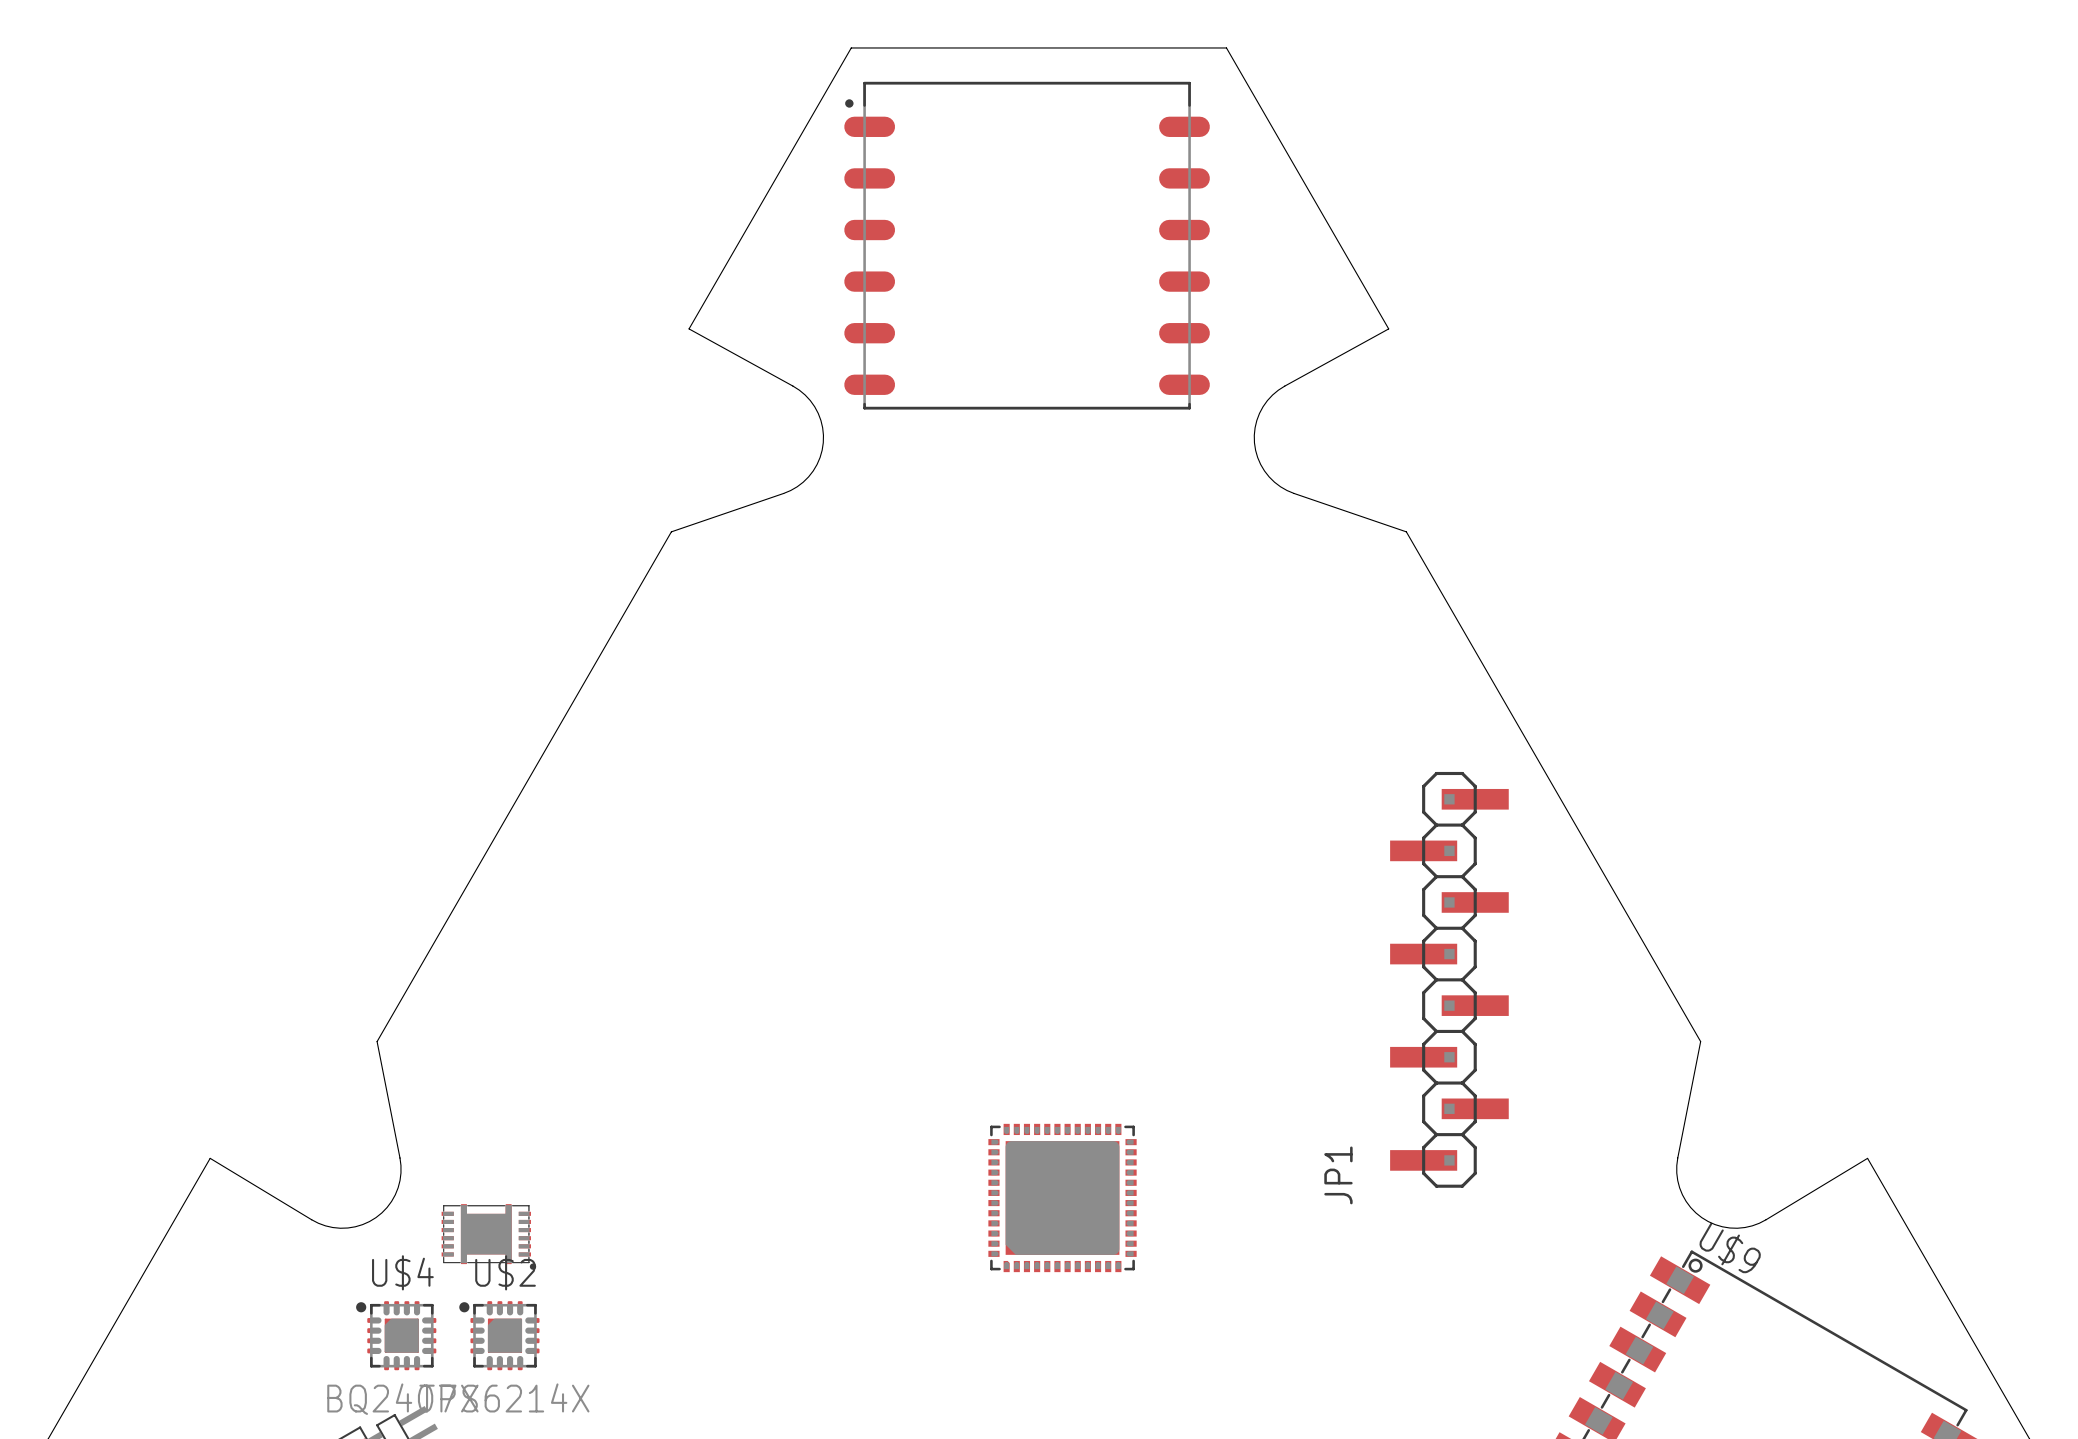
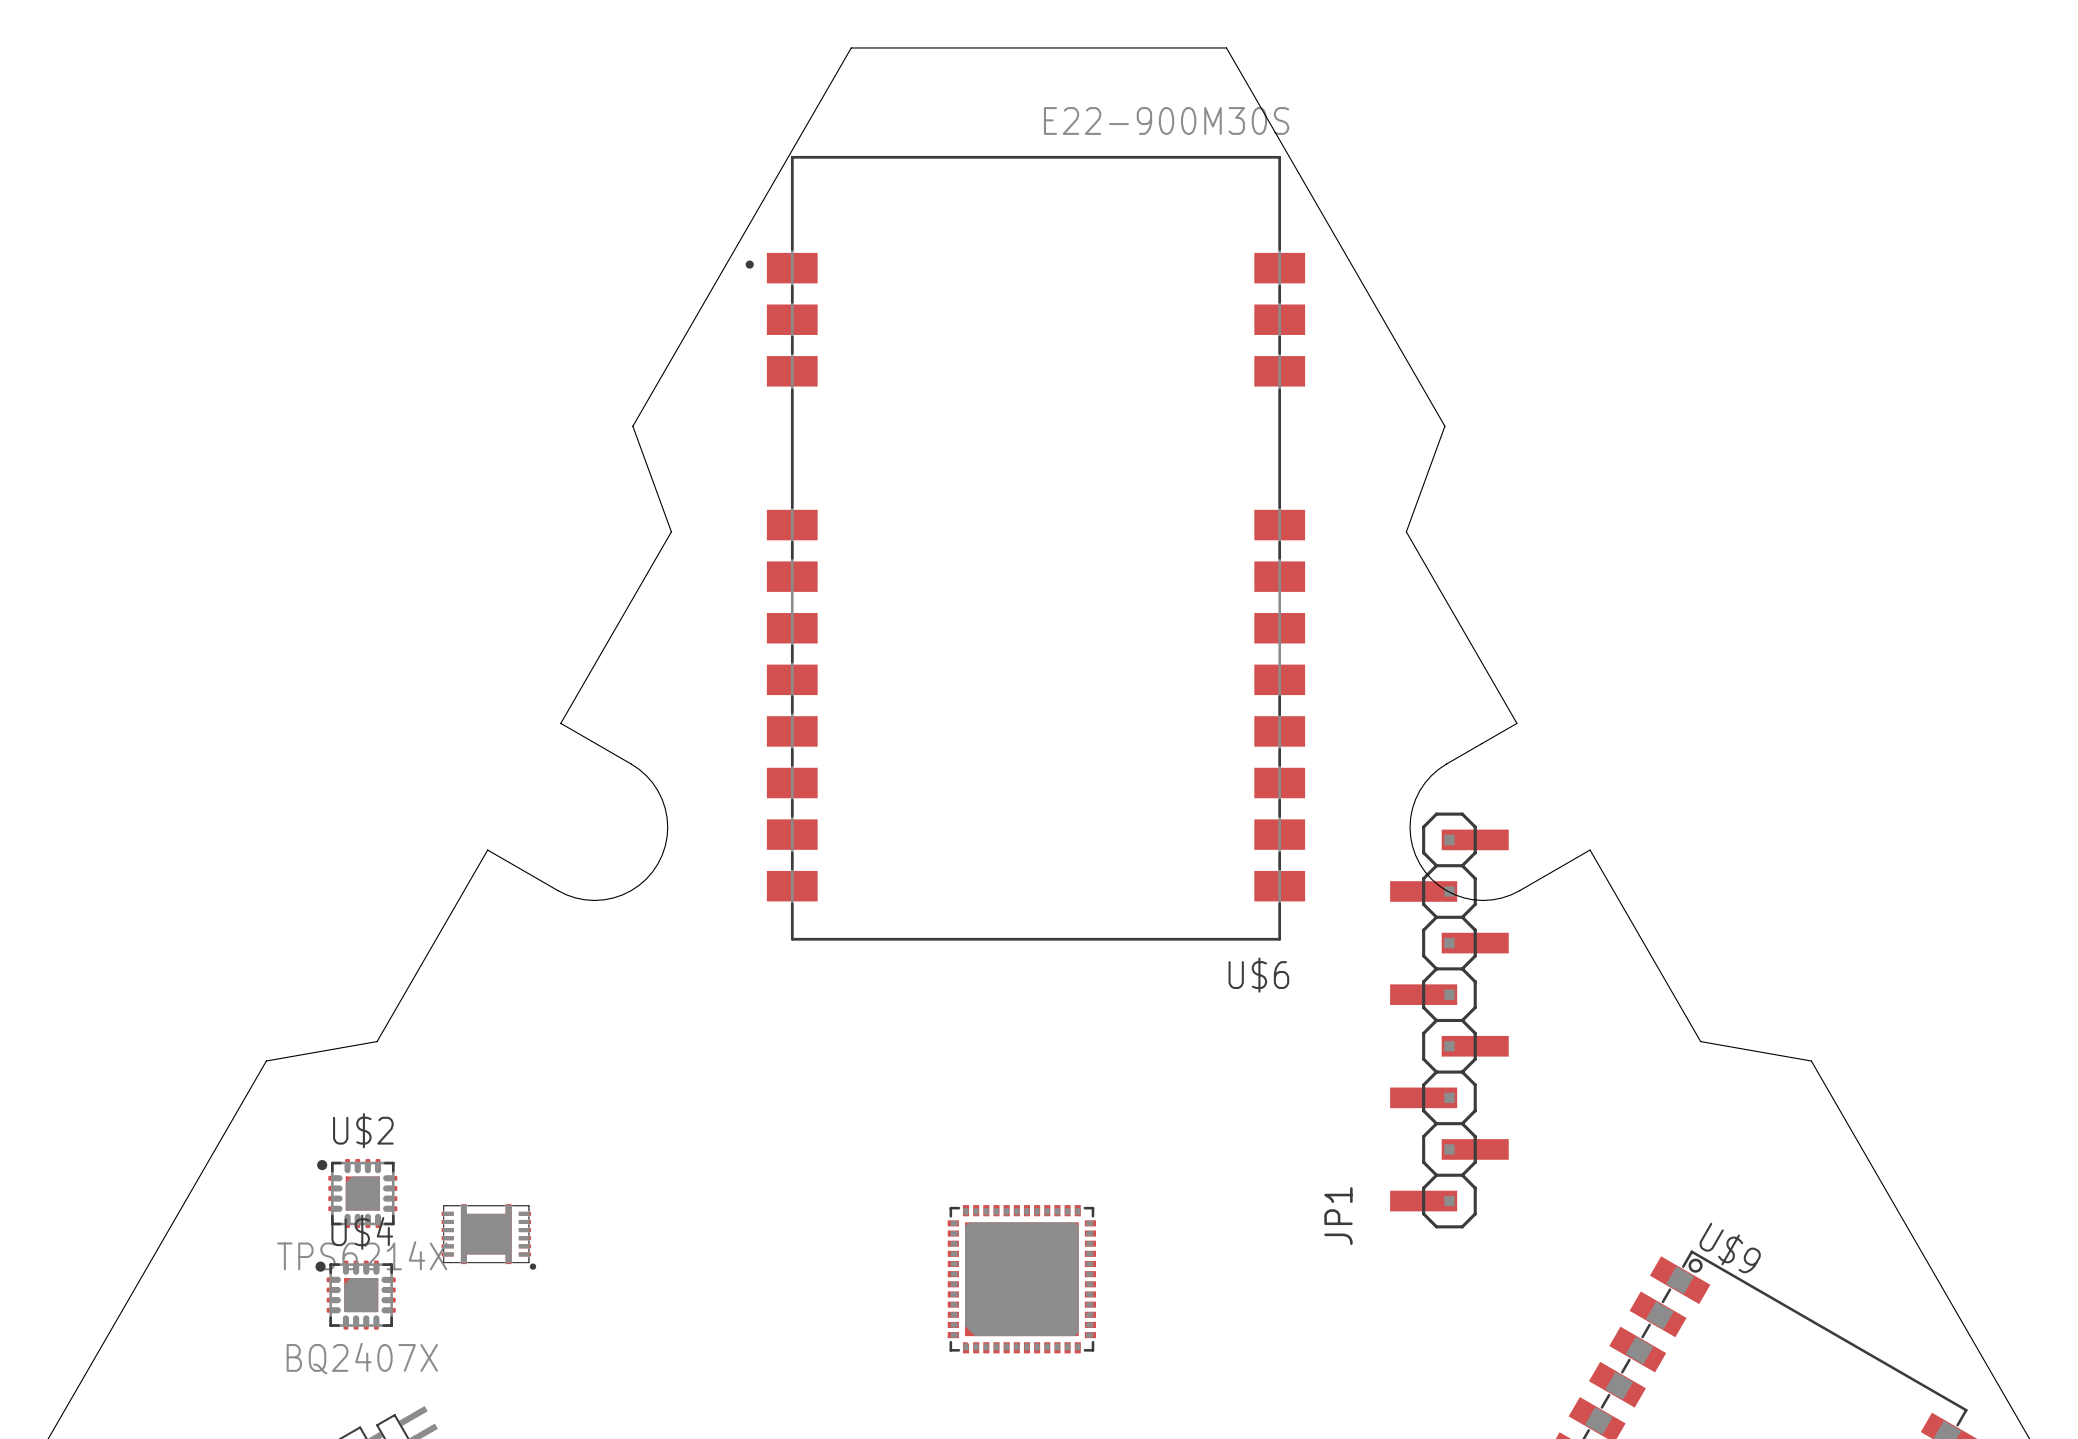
part: (1027, 245) -> none
board edge: (689, 328) (793, 386) (805, 395) (814, 406) (820, 420) (823, 442) (820, 457) (813, 470) (797, 486) (783, 493) (671, 531) -> (689, 328) (632, 426) (671, 531)
board edge: (1388, 328) (1284, 386) (1272, 395) (1263, 406) (1256, 420) (1254, 442) (1257, 457) (1264, 470) (1280, 486) (1294, 493) (1406, 531) -> (1388, 328) (1444, 426) (1406, 531)
U$6: none -> E22-900M30S (1025, 548)
board edge: (560, 723) (487, 850) -> (560, 723) (631, 764) (652, 782) (662, 799) (667, 827) (665, 846) (657, 863) (646, 879) (622, 894) (604, 899) (585, 899) (558, 890) (487, 850)
board edge: (1516, 723) (1590, 850) -> (1516, 723) (1446, 764) (1425, 782) (1415, 799) (1410, 827) (1412, 846) (1419, 863) (1431, 879) (1455, 894) (1473, 899) (1492, 899) (1519, 890) (1590, 850)
JP1 position: (1449, 979) -> (1449, 1020)
board edge: (377, 1041) (399, 1158) (400, 1173) (395, 1194) (387, 1207) (375, 1217) (355, 1226) (340, 1228) (325, 1225) (311, 1219) (210, 1158) -> (377, 1041) (266, 1061) (210, 1158)
board edge: (1700, 1041) (1677, 1158) (1676, 1173) (1682, 1194) (1690, 1207) (1701, 1217) (1722, 1226) (1737, 1228) (1752, 1225) (1766, 1219) (1867, 1158) -> (1700, 1041) (1811, 1061) (1867, 1158)
part position: (1062, 1197) -> (1021, 1279)
U$4 position: (396, 1335) -> (355, 1295)
U$2 position: (499, 1335) -> (357, 1193)

